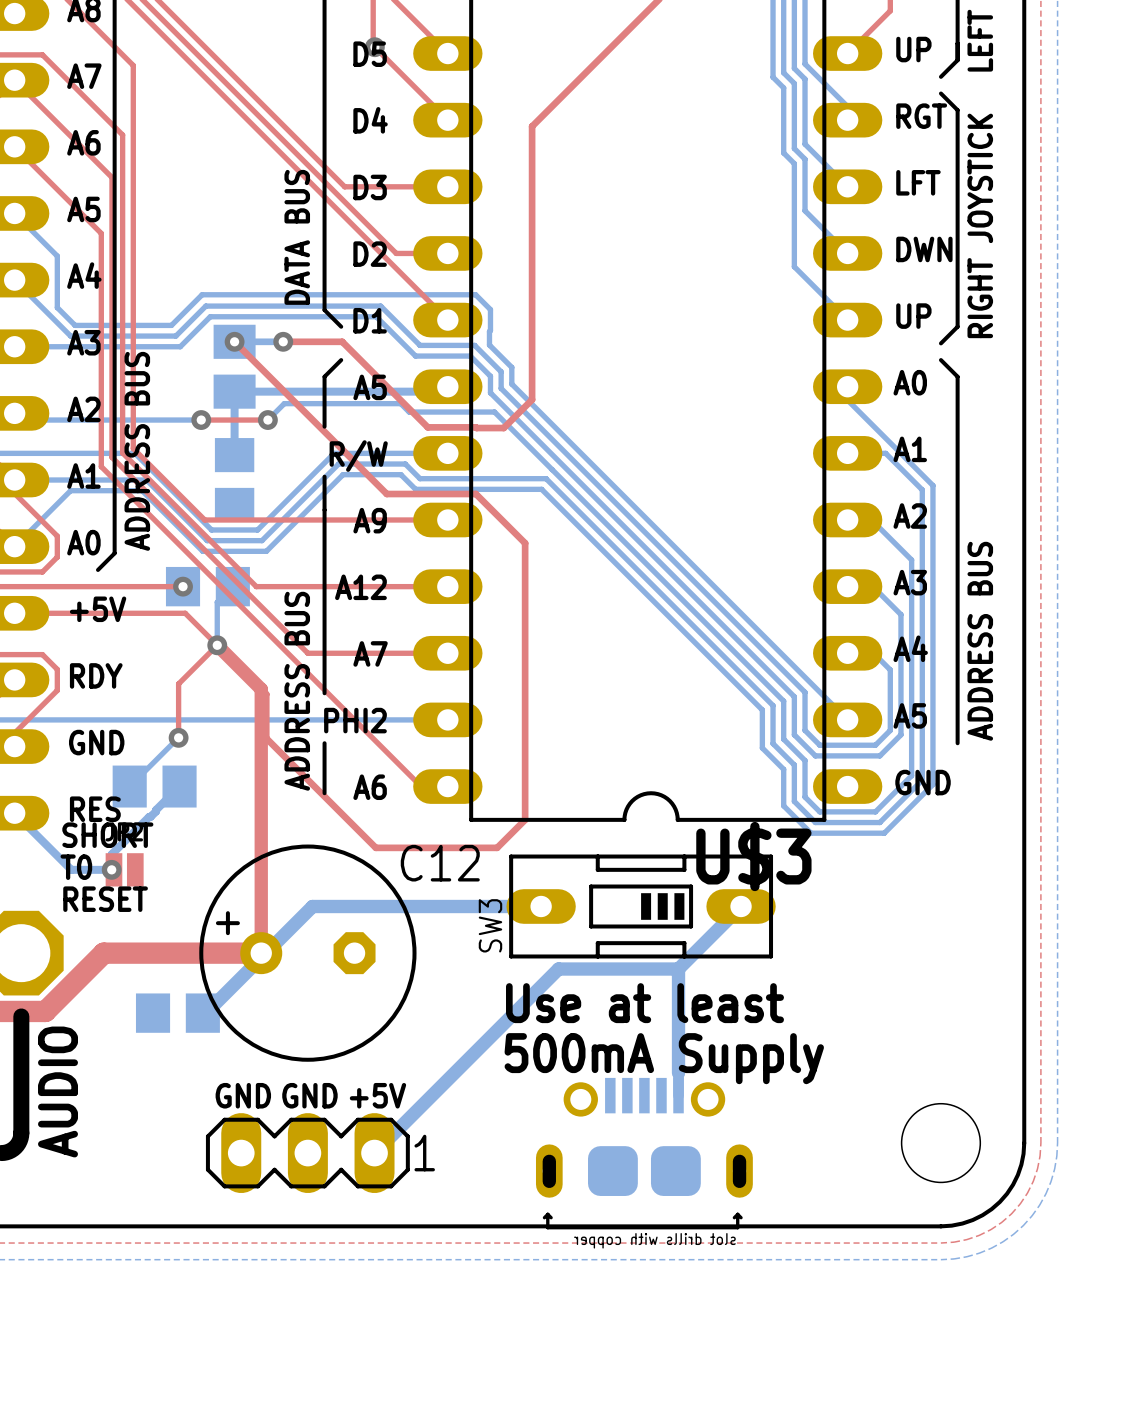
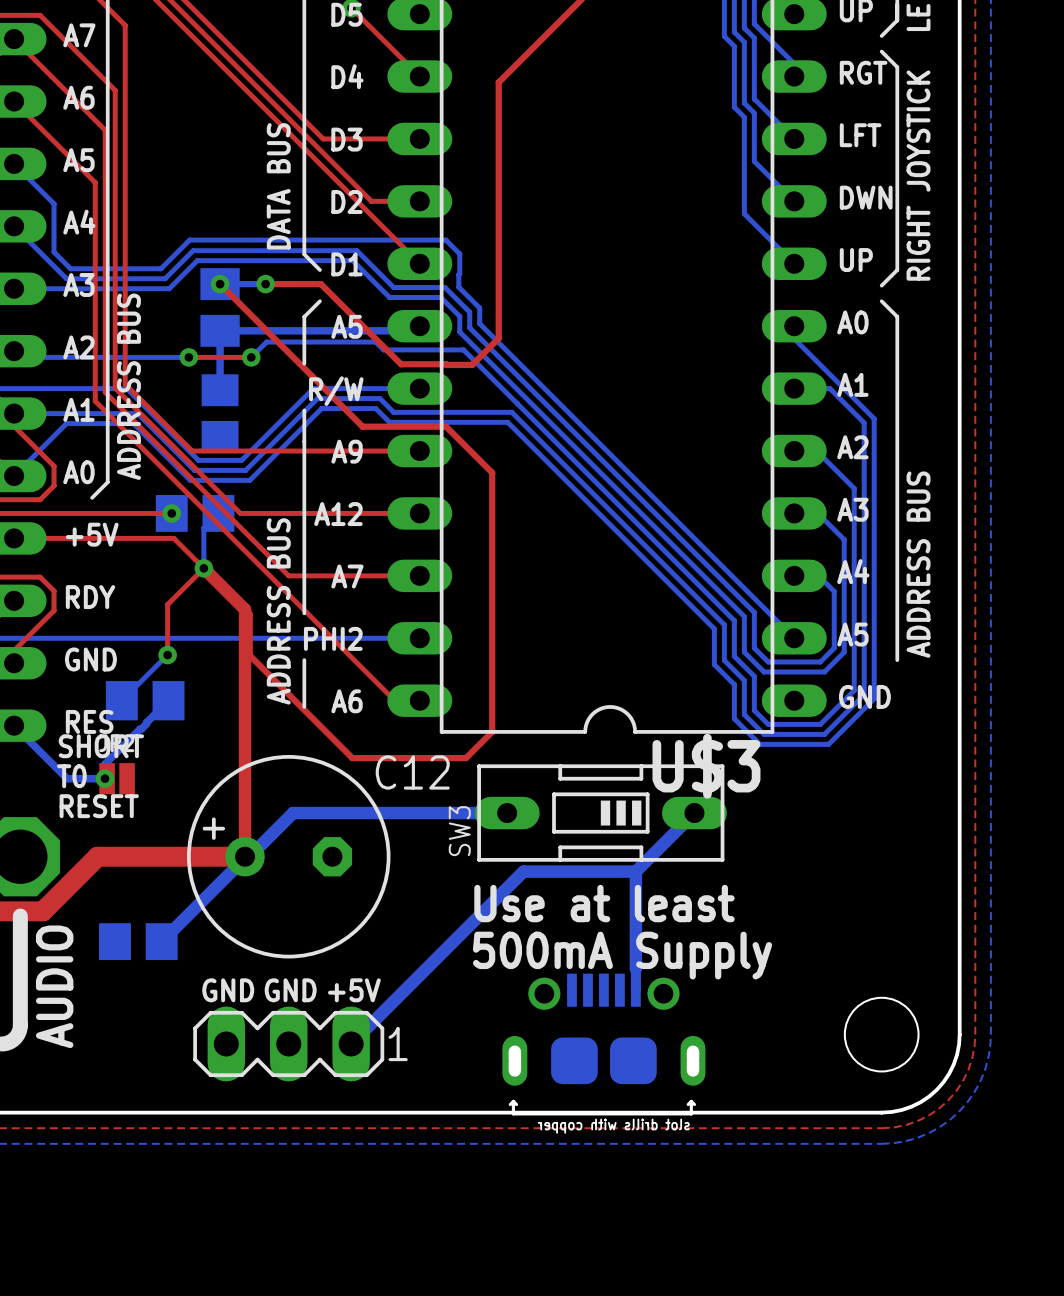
bottom track: (263, 955) (203, 1015) (202, 1013) -> (247, 858) (244, 858) (161, 941)
part position: (177, 1013) -> (138, 941)

